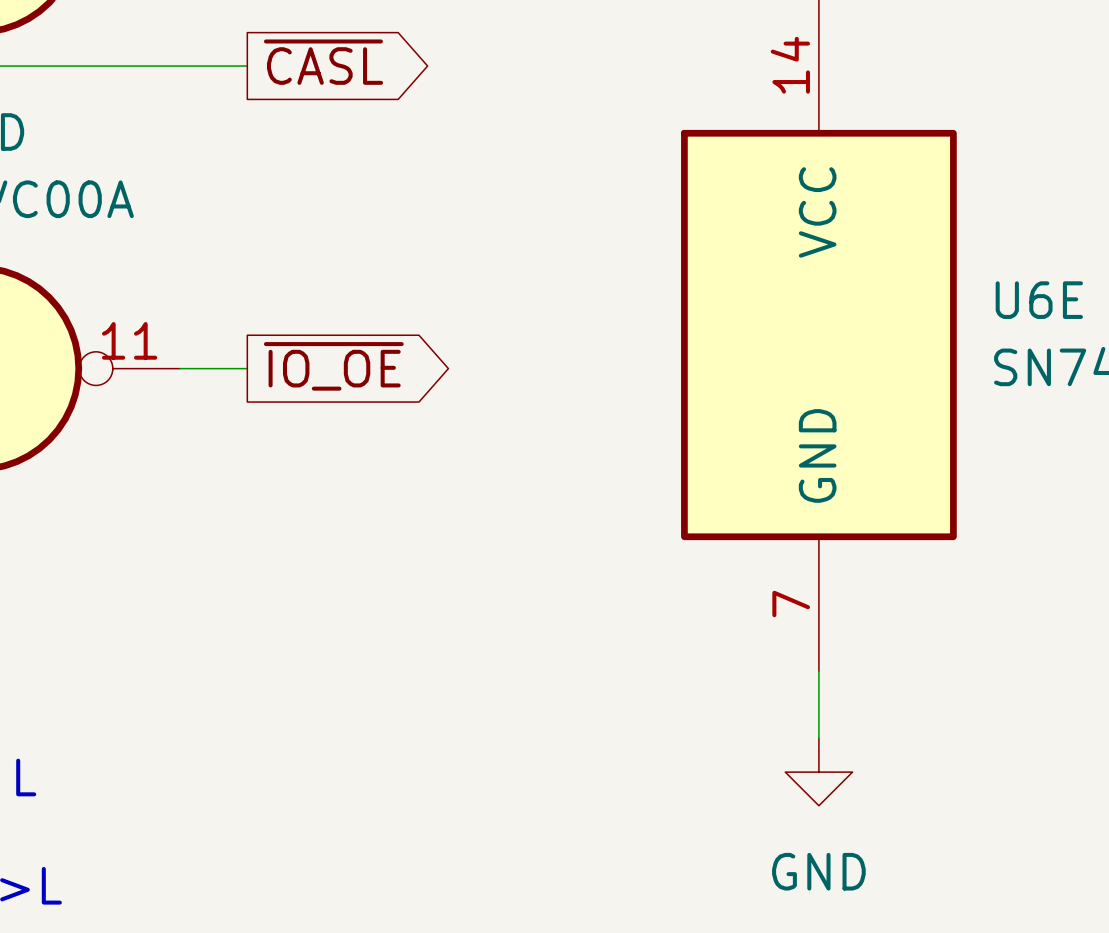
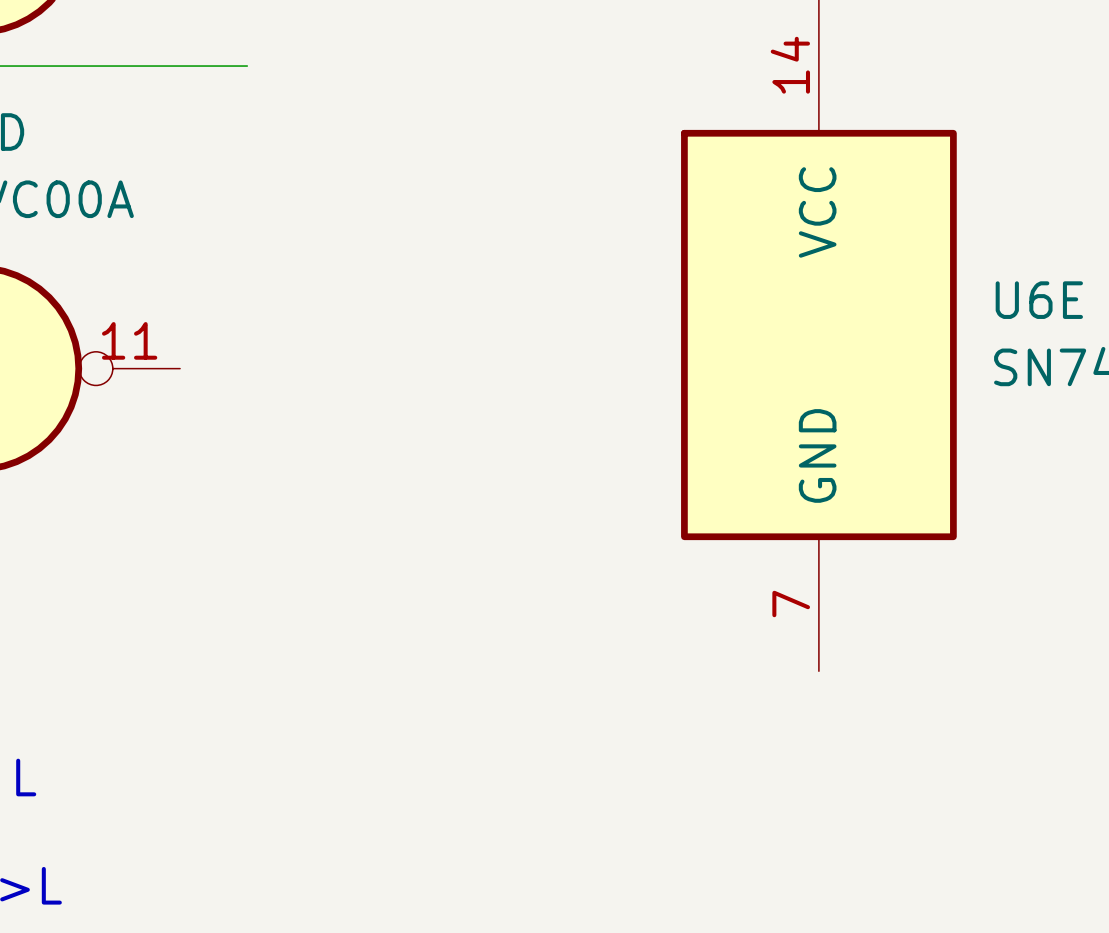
global label: ~{CASL} (323, 62) -> none
global label: ~{IO_OE} (333, 366) -> none
wire: (180, 368) (247, 368) -> none
wire: (818, 671) (818, 738) -> none
power symbol: GND (818, 772) -> none

